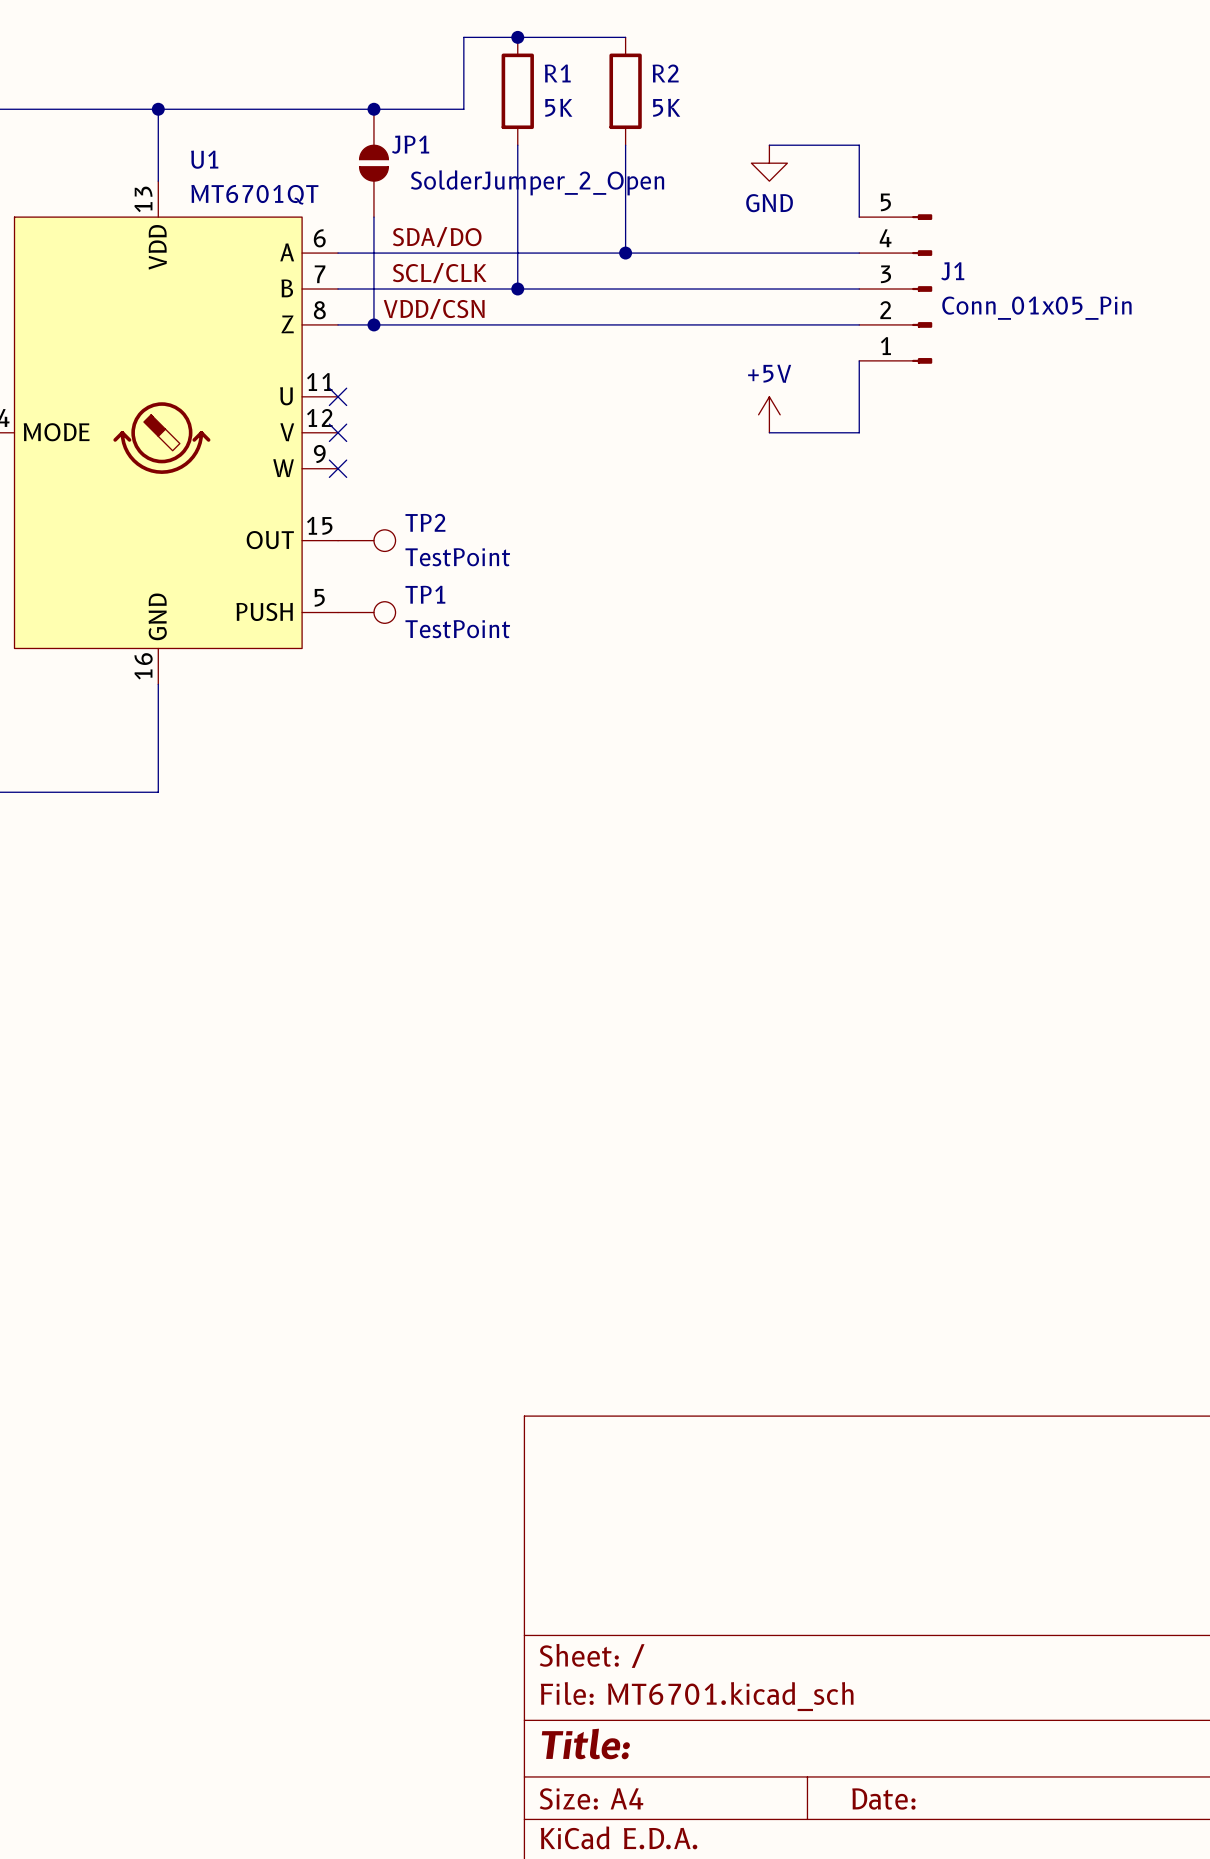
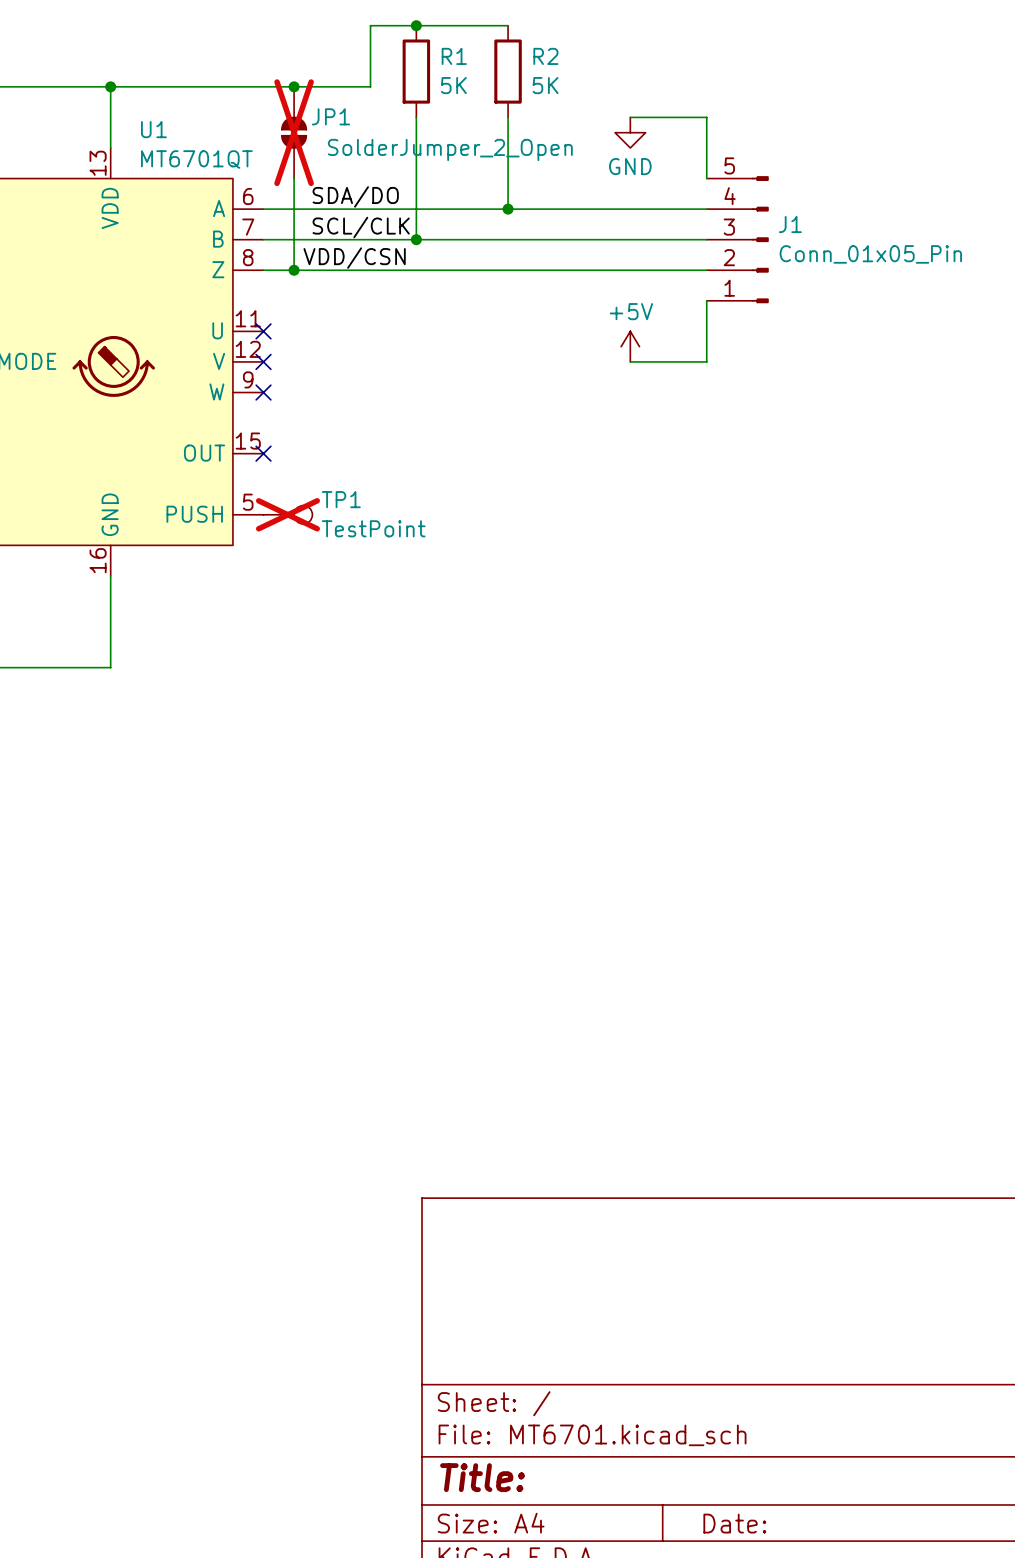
JP1 do-not-place cross: none -> (294, 132)
no-connect mark: none -> (263, 453)
TP2: TestPoint (366, 540) -> none
TP1 do-not-place cross: none -> (287, 514)

